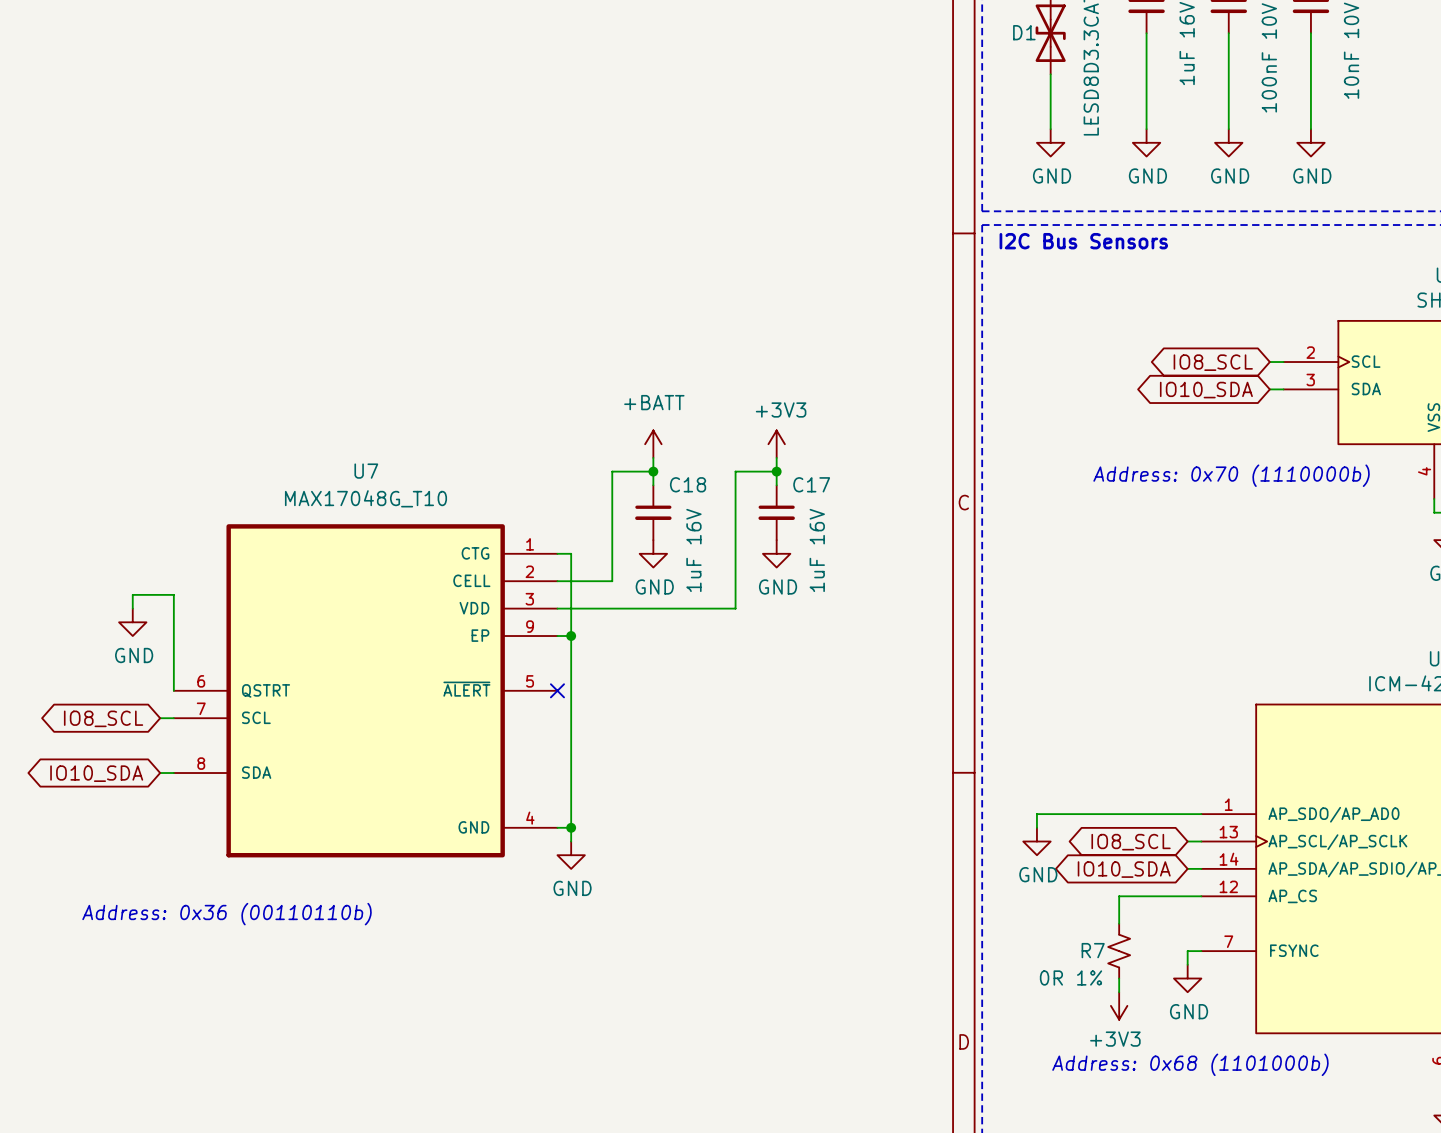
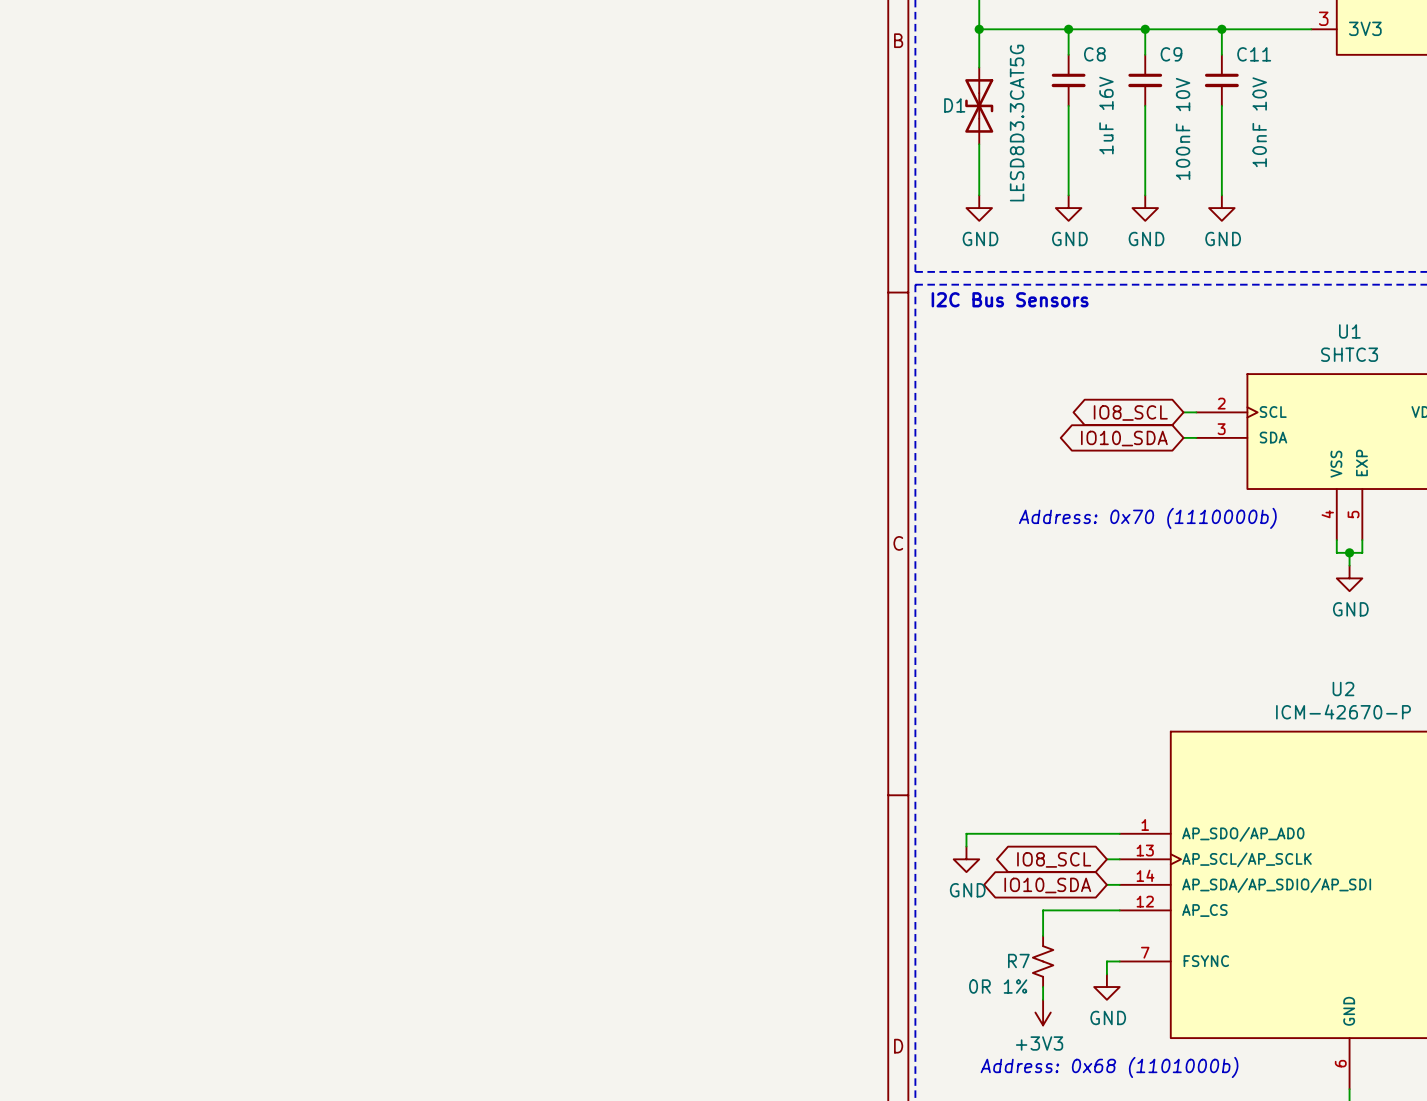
power symbol: +BATT (653, 444) -> none
power symbol: +3V3 (776, 444) -> none
wire: (653, 457) (653, 485) -> none
wire: (776, 457) (776, 485) -> none
wire: (653, 471) (612, 471) (612, 581) (557, 581) -> none
junction: (653, 471) -> none
wire: (776, 471) (735, 471) (735, 608) (557, 608) -> none
junction: (776, 471) -> none
C18: 1uF 16V (653, 512) -> none
C17: 1uF 16V (776, 512) -> none
wire: (557, 553) (571, 553) (571, 841) -> none
power symbol: GND (653, 553) -> none
power symbol: GND (776, 553) -> none
wire: (132, 608) (132, 594) (173, 594) (173, 690) -> none
power symbol: GND (132, 622) -> none
wire: (557, 636) (571, 636) -> none
junction: (571, 636) -> none
U7: MAX17048G_T10 (365, 690) -> none
no-connect mark: (557, 690) -> none
global label: IO8_SCL (103, 718) -> none
wire: (160, 718) (173, 718) -> none
global label: IO10_SDA (96, 773) -> none
wire: (160, 773) (173, 773) -> none
wire: (557, 827) (571, 827) -> none
junction: (571, 827) -> none
power symbol: GND (571, 855) -> none
text: Address: 0x36 (00110110b) (227, 914) -> none

